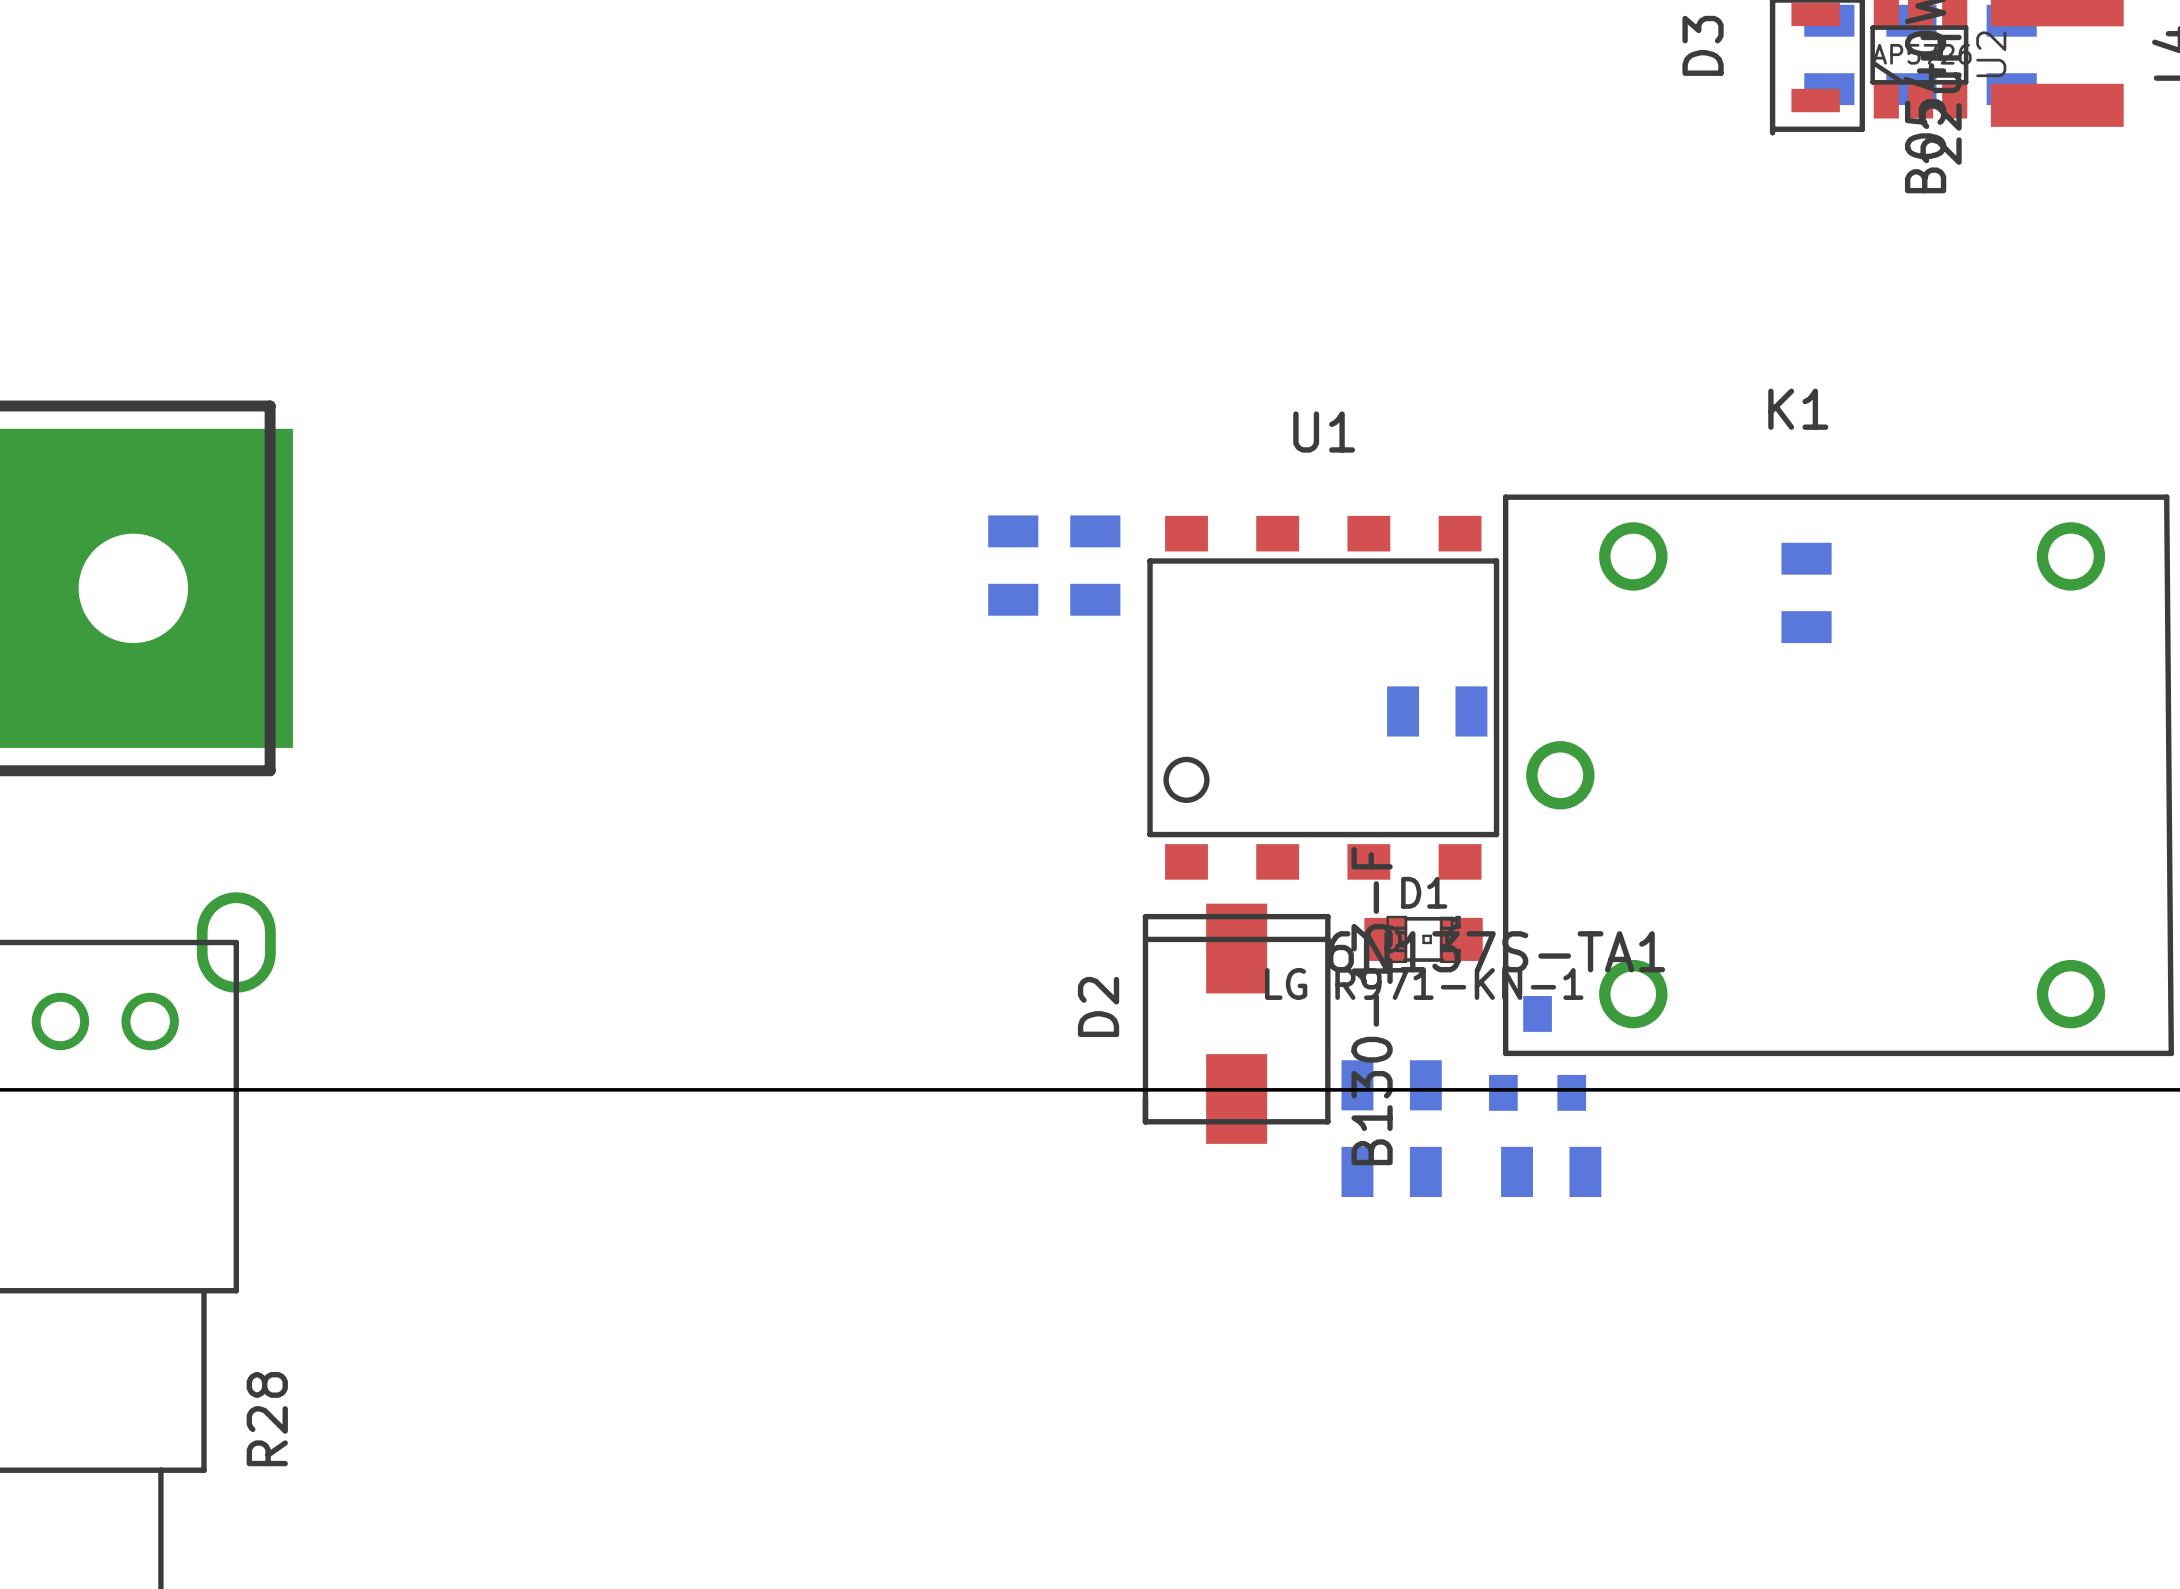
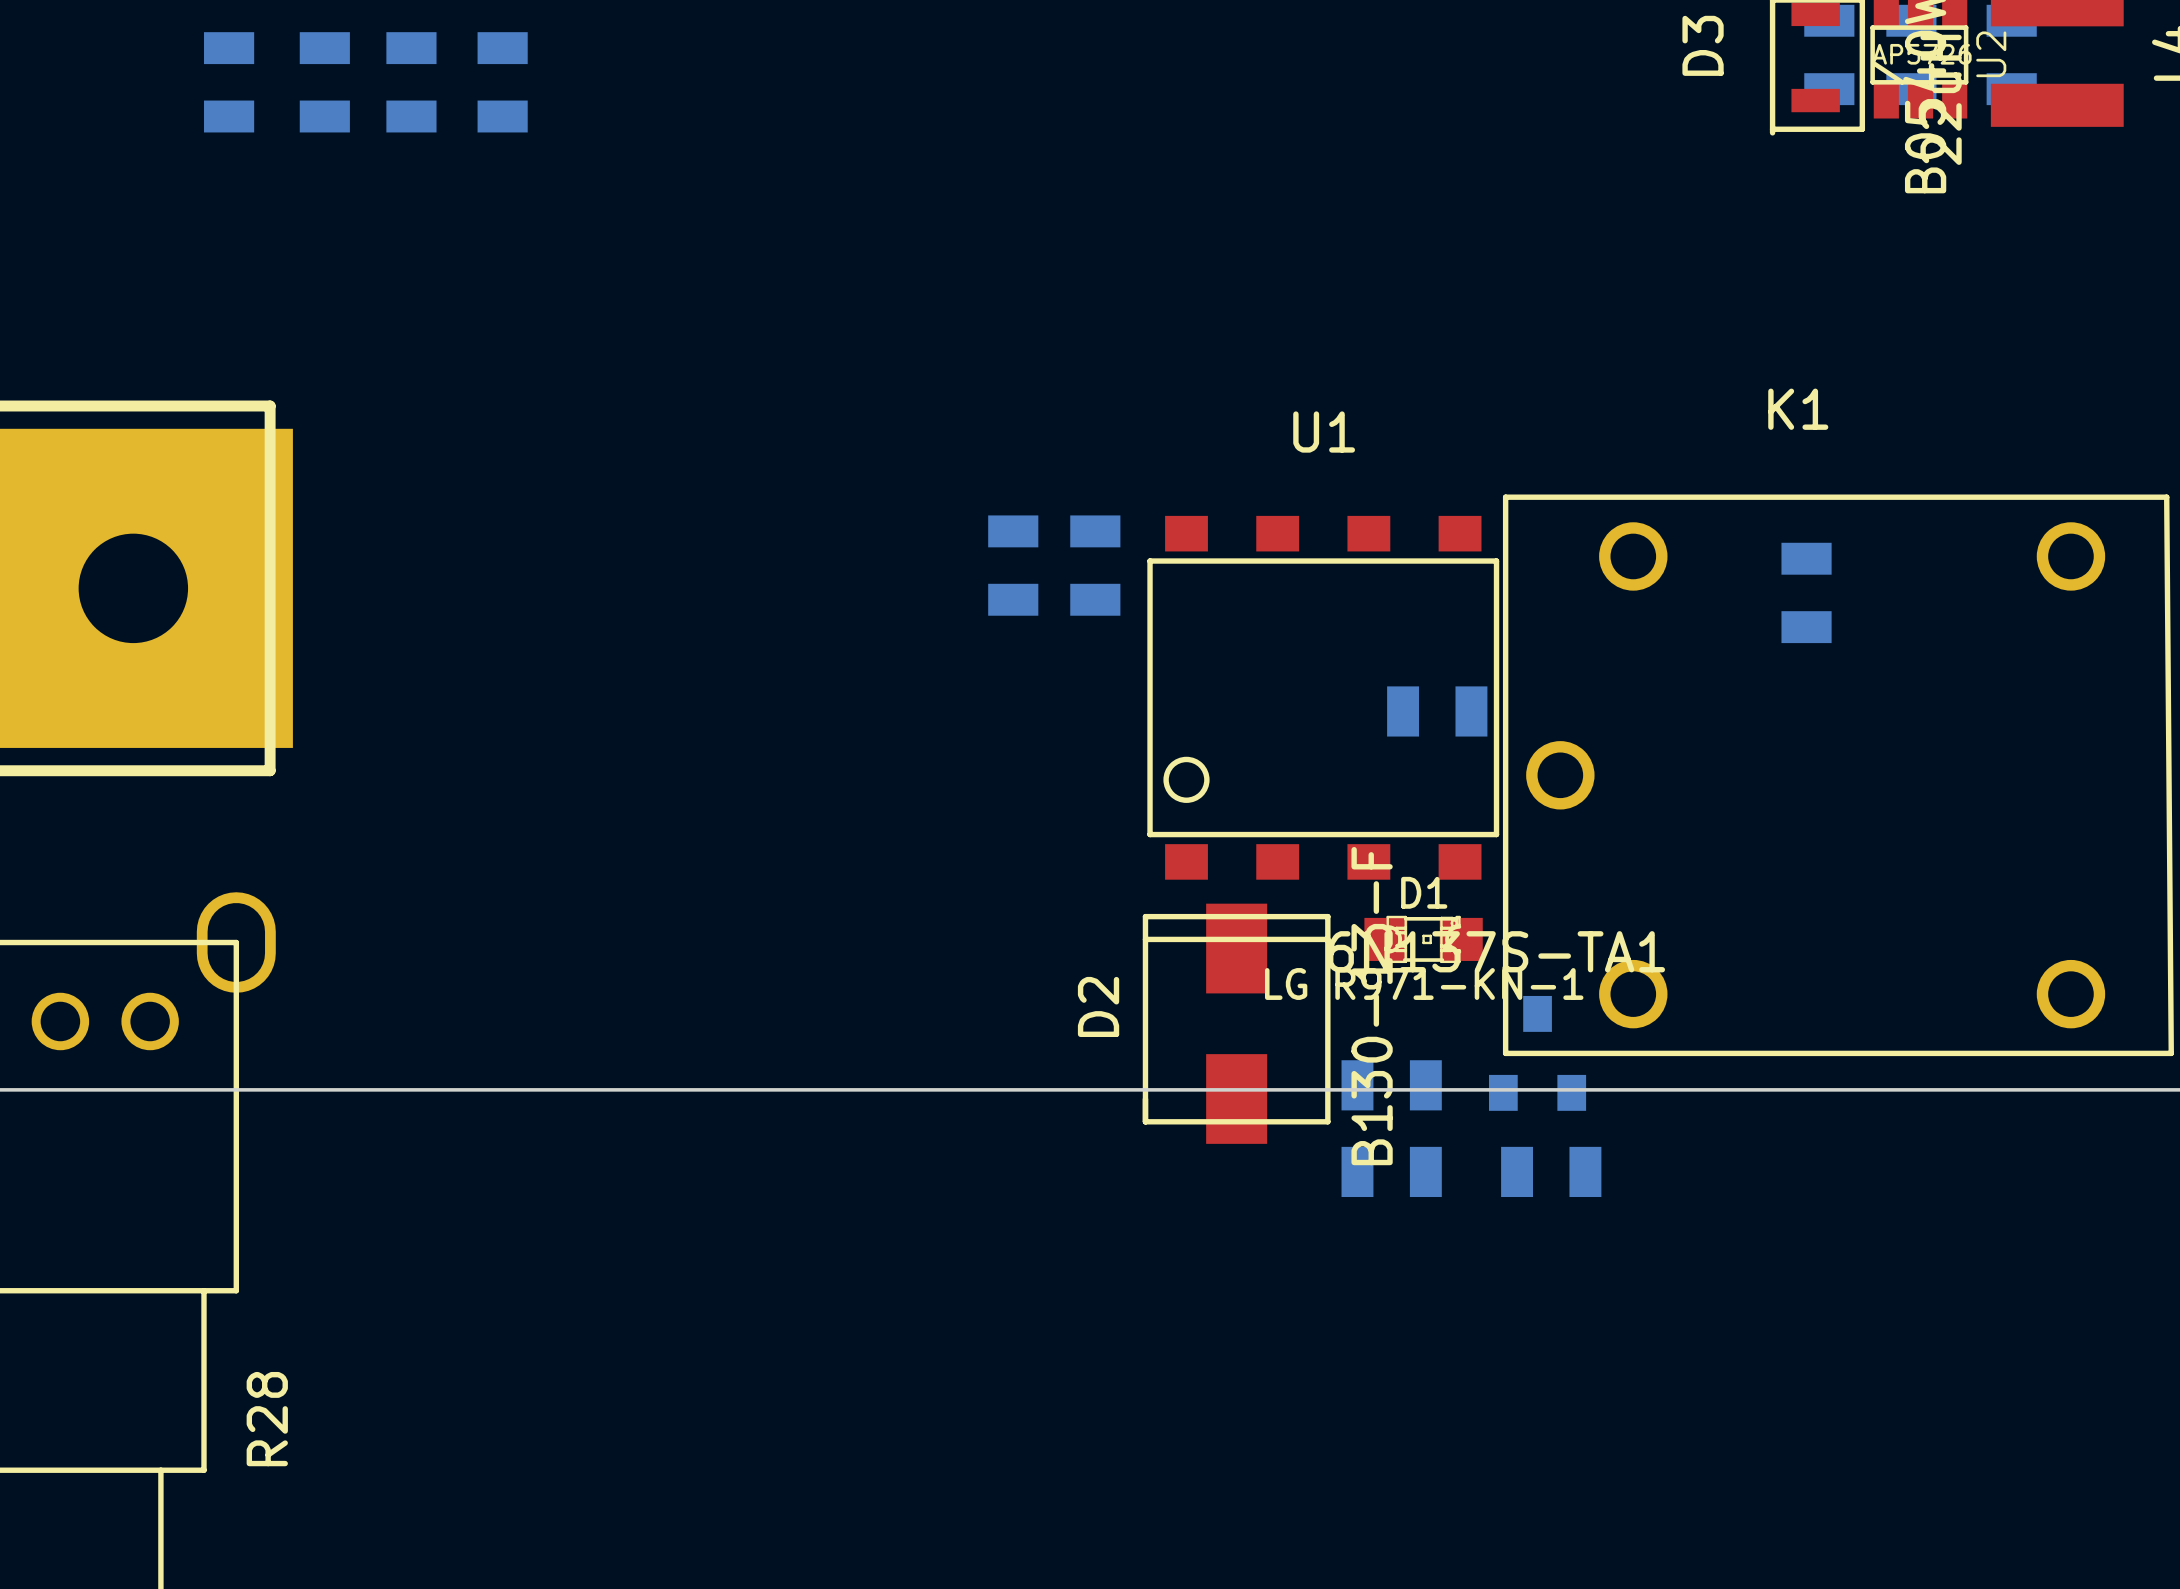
part: none -> (229, 82)
part: none -> (324, 82)
part: none -> (411, 82)
part: none -> (502, 82)

